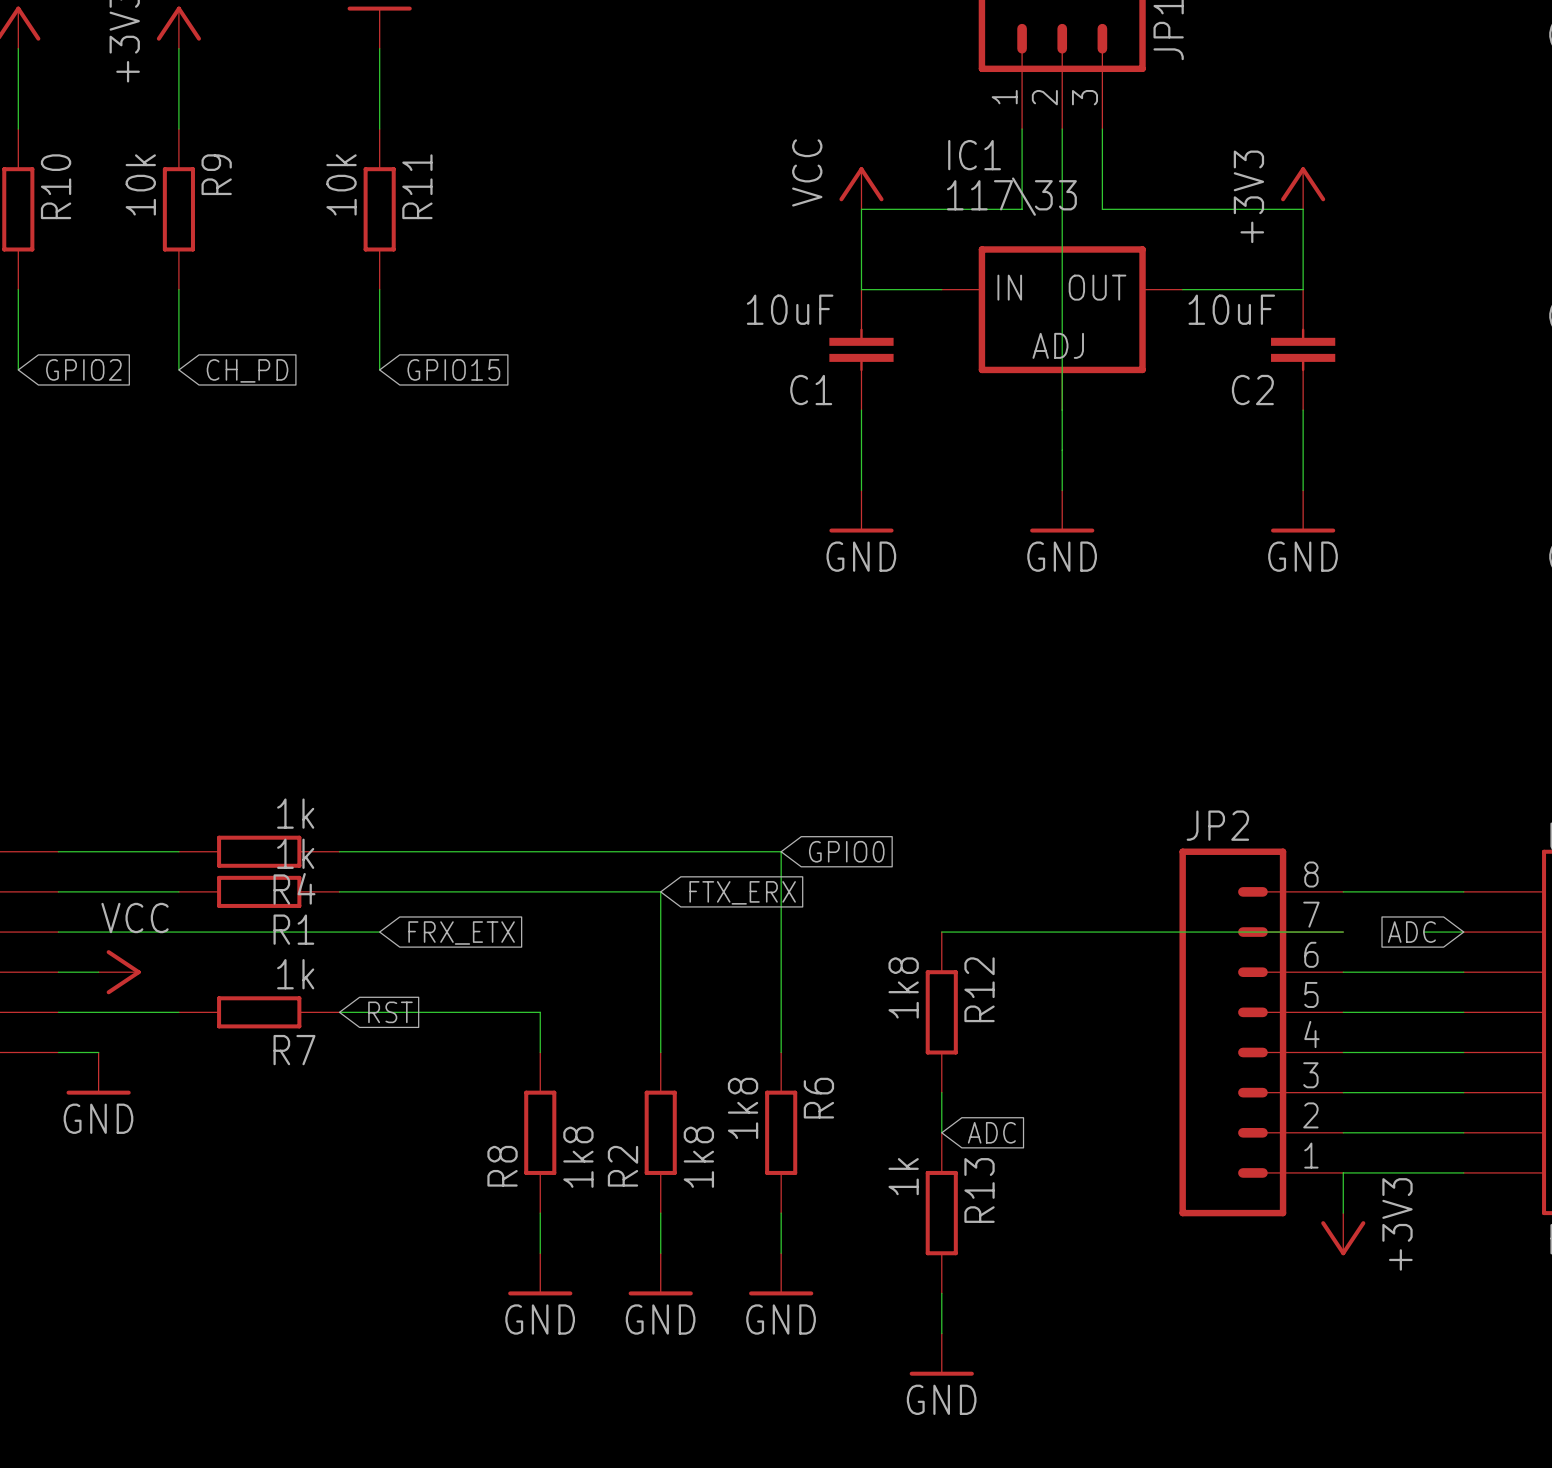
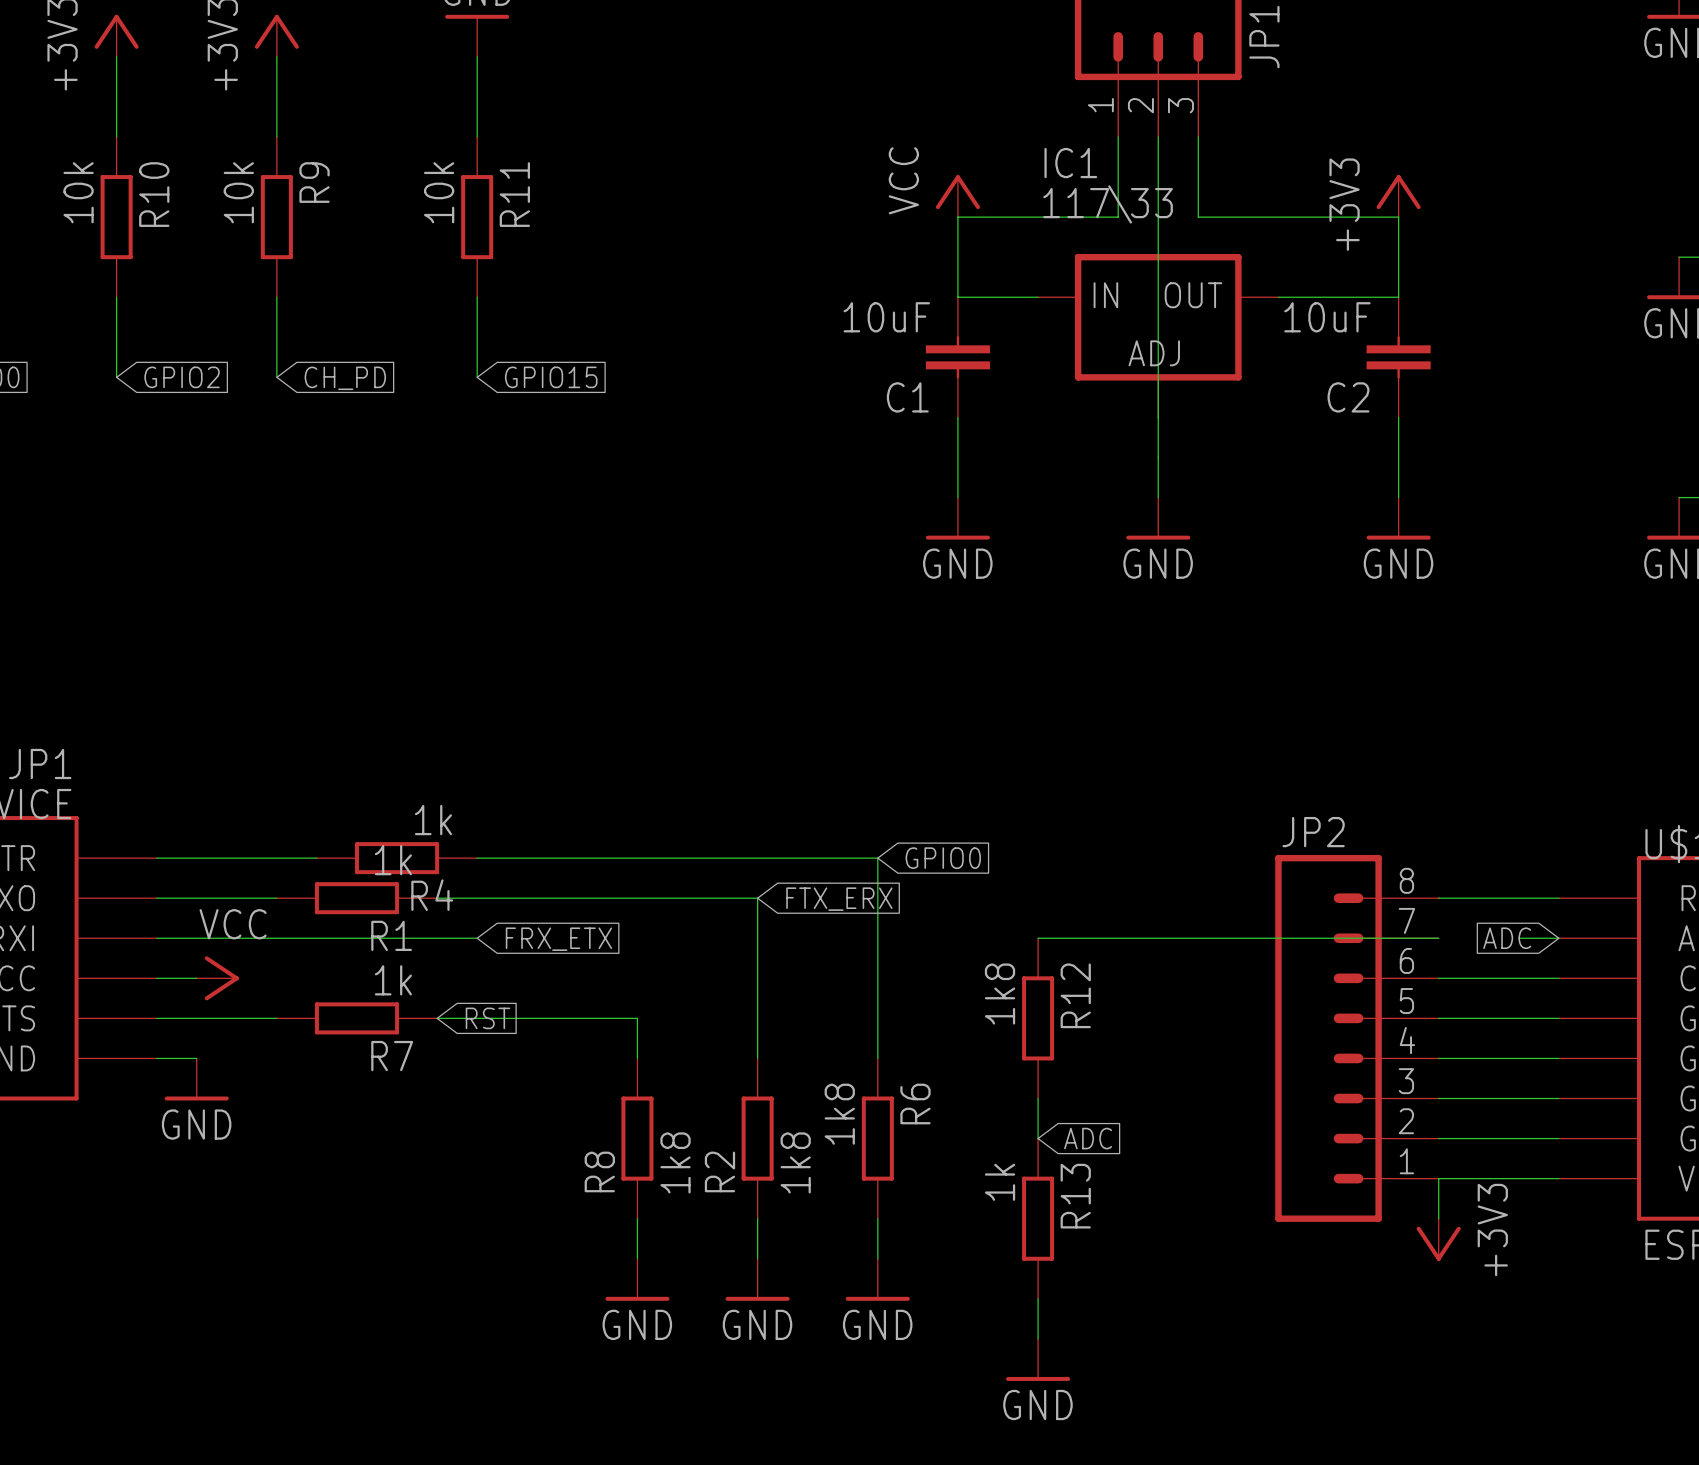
R4 position: (259, 851) -> (397, 858)

